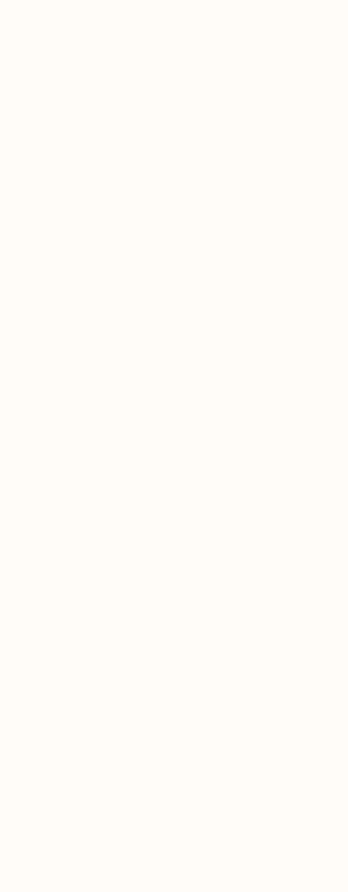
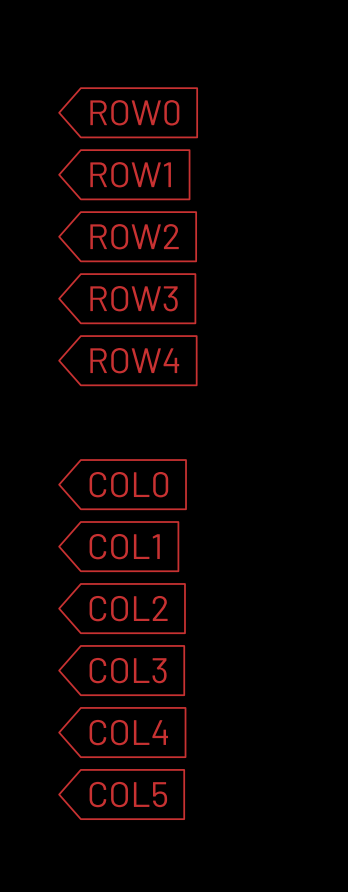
global label: none -> ROW0 (134, 112)
global label: none -> ROW1 (130, 174)
global label: none -> ROW2 (134, 236)
global label: none -> ROW3 (134, 298)
global label: none -> ROW4 (134, 360)
global label: none -> COL0 (128, 484)
global label: none -> COL1 (124, 546)
global label: none -> COL2 (128, 608)
global label: none -> COL3 (128, 670)
global label: none -> COL4 (128, 732)
global label: none -> COL5 (128, 794)

